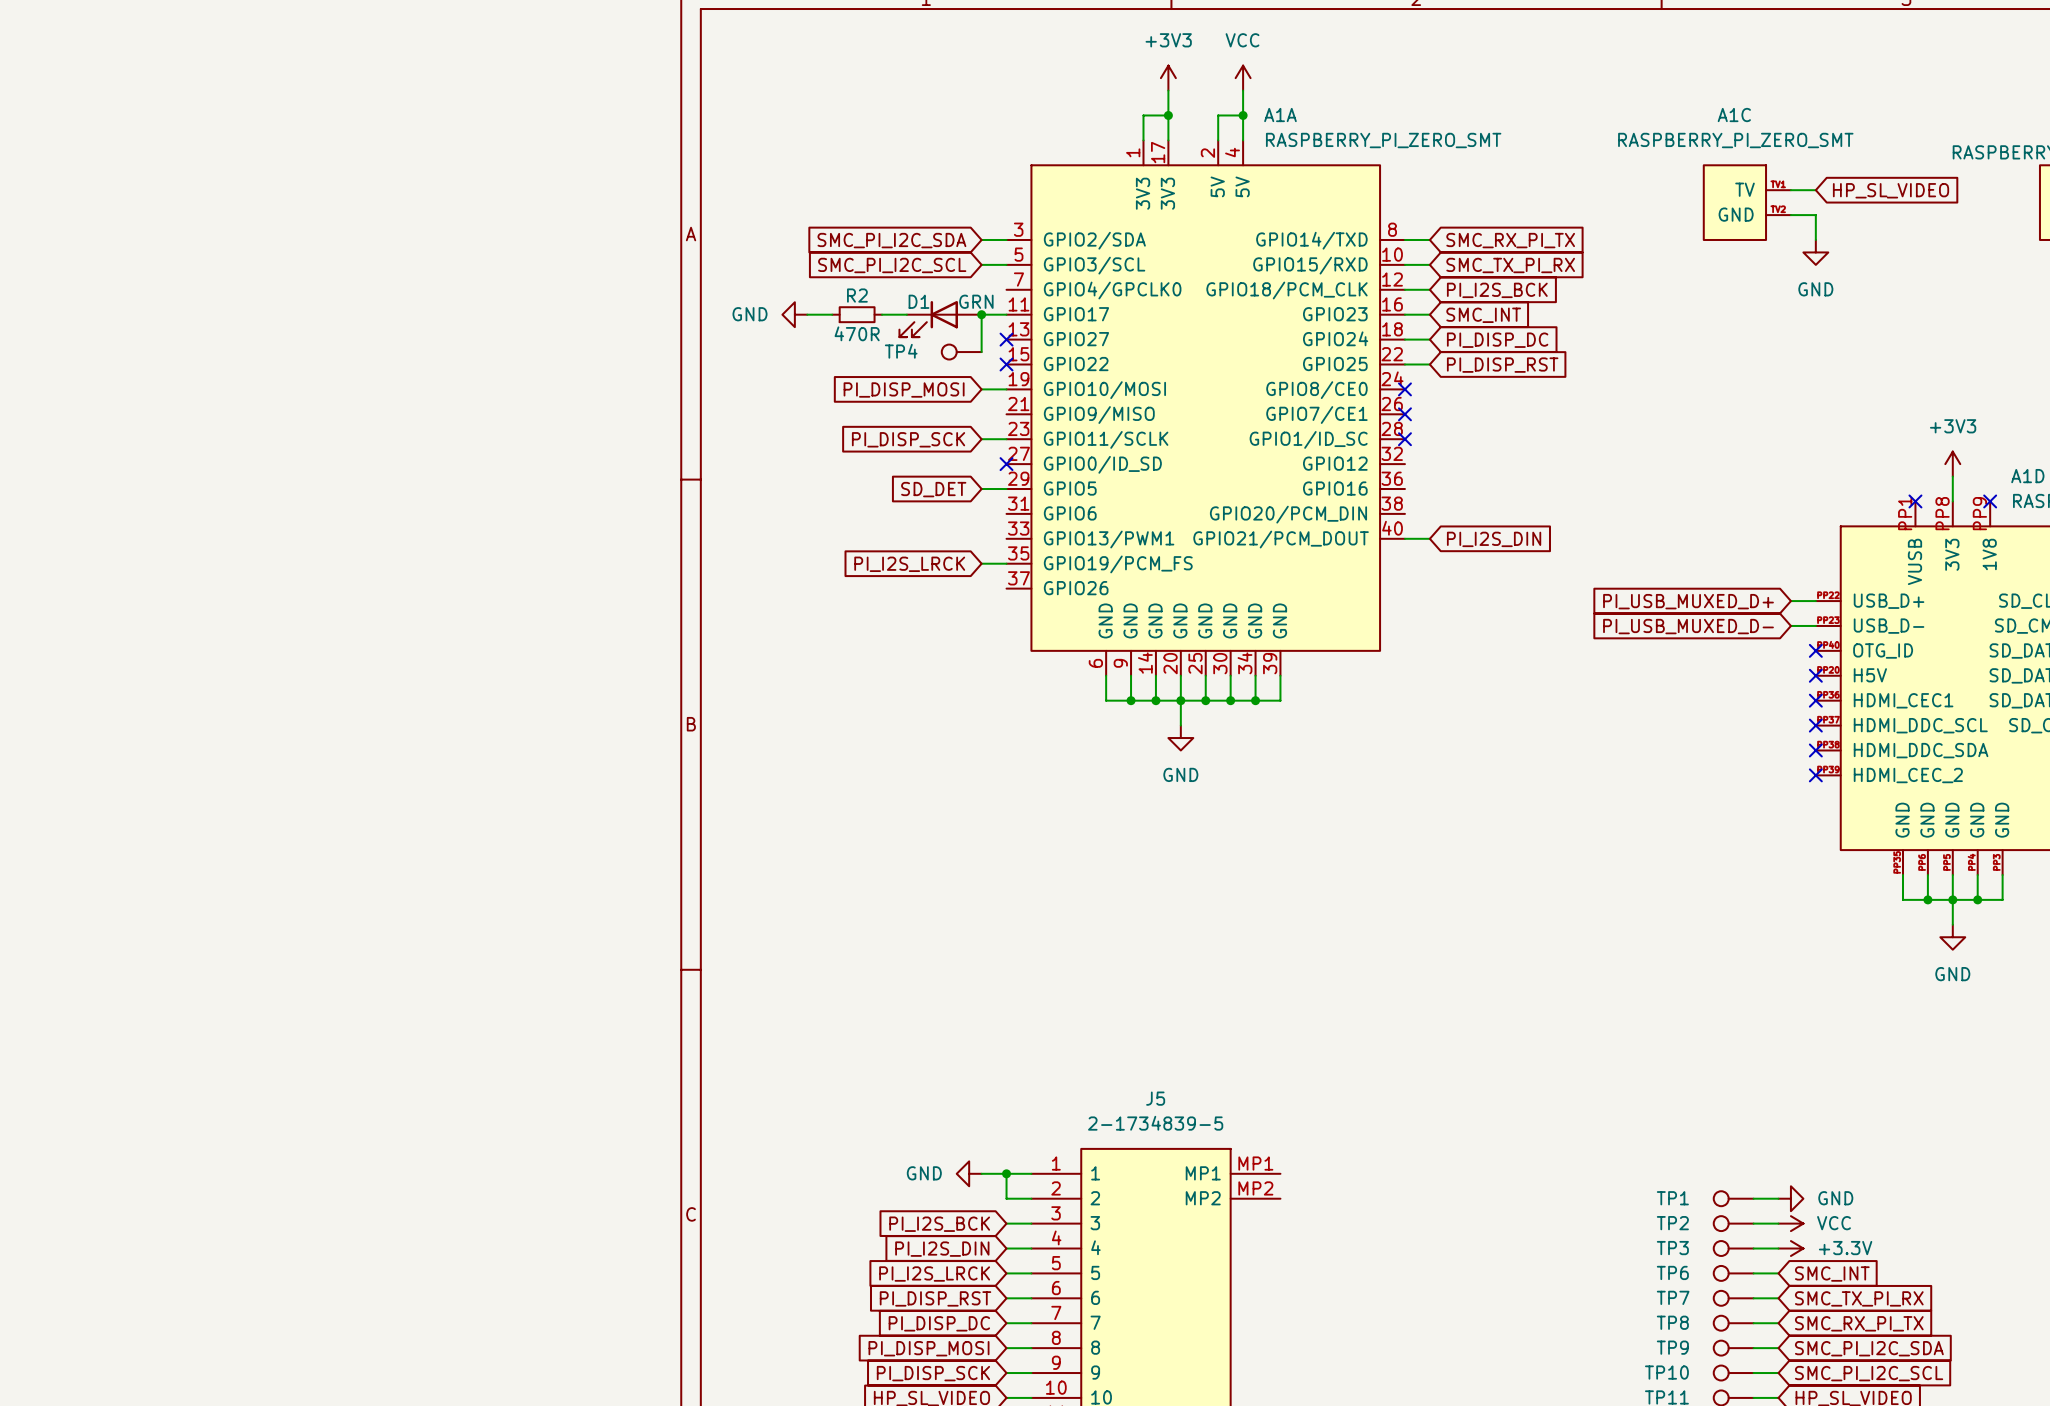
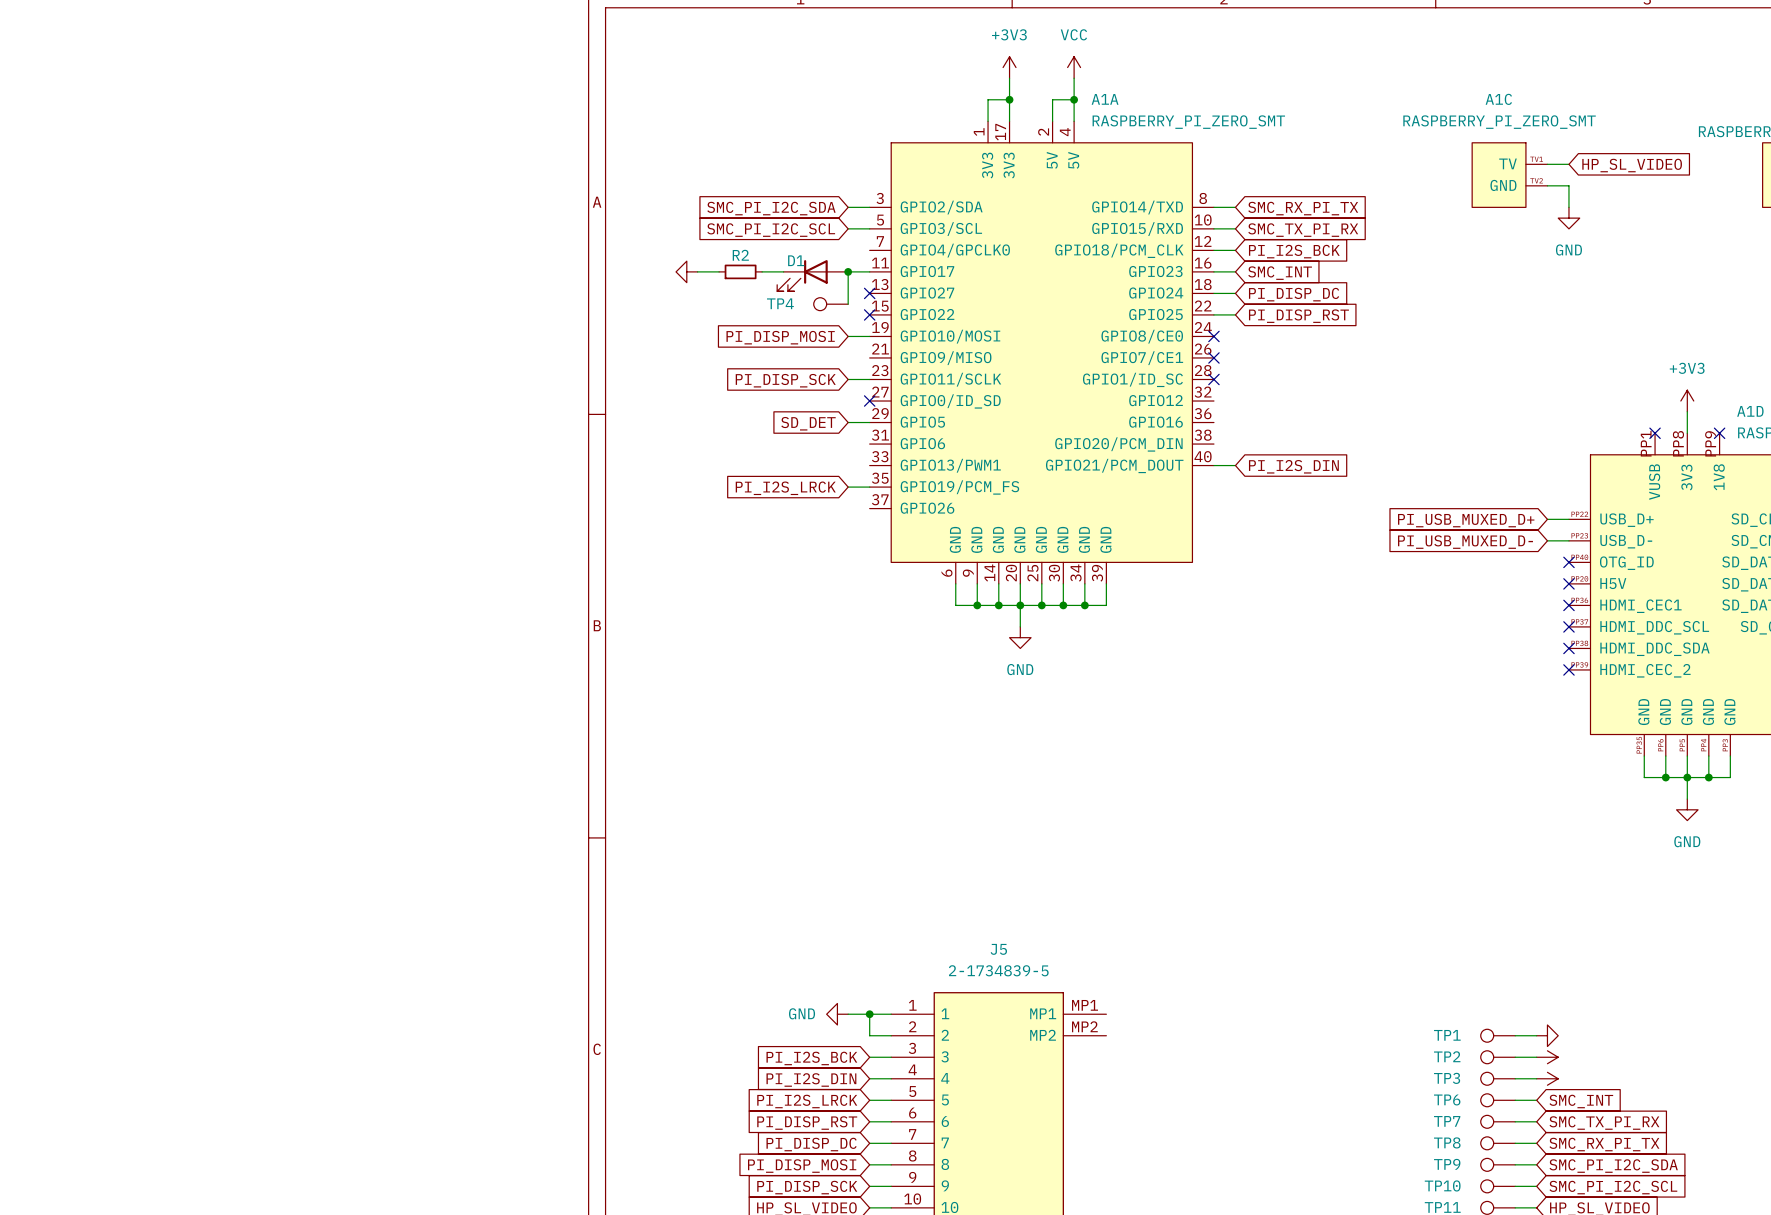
D1 value: GRN (976, 301) -> none
power symbol text: GND (750, 314) -> none
R2 value: 470R (857, 333) -> none
power symbol text: GND (1835, 1198) -> none
power symbol text: VCC (1834, 1223) -> none
power symbol text: +3.3V (1845, 1248) -> none

